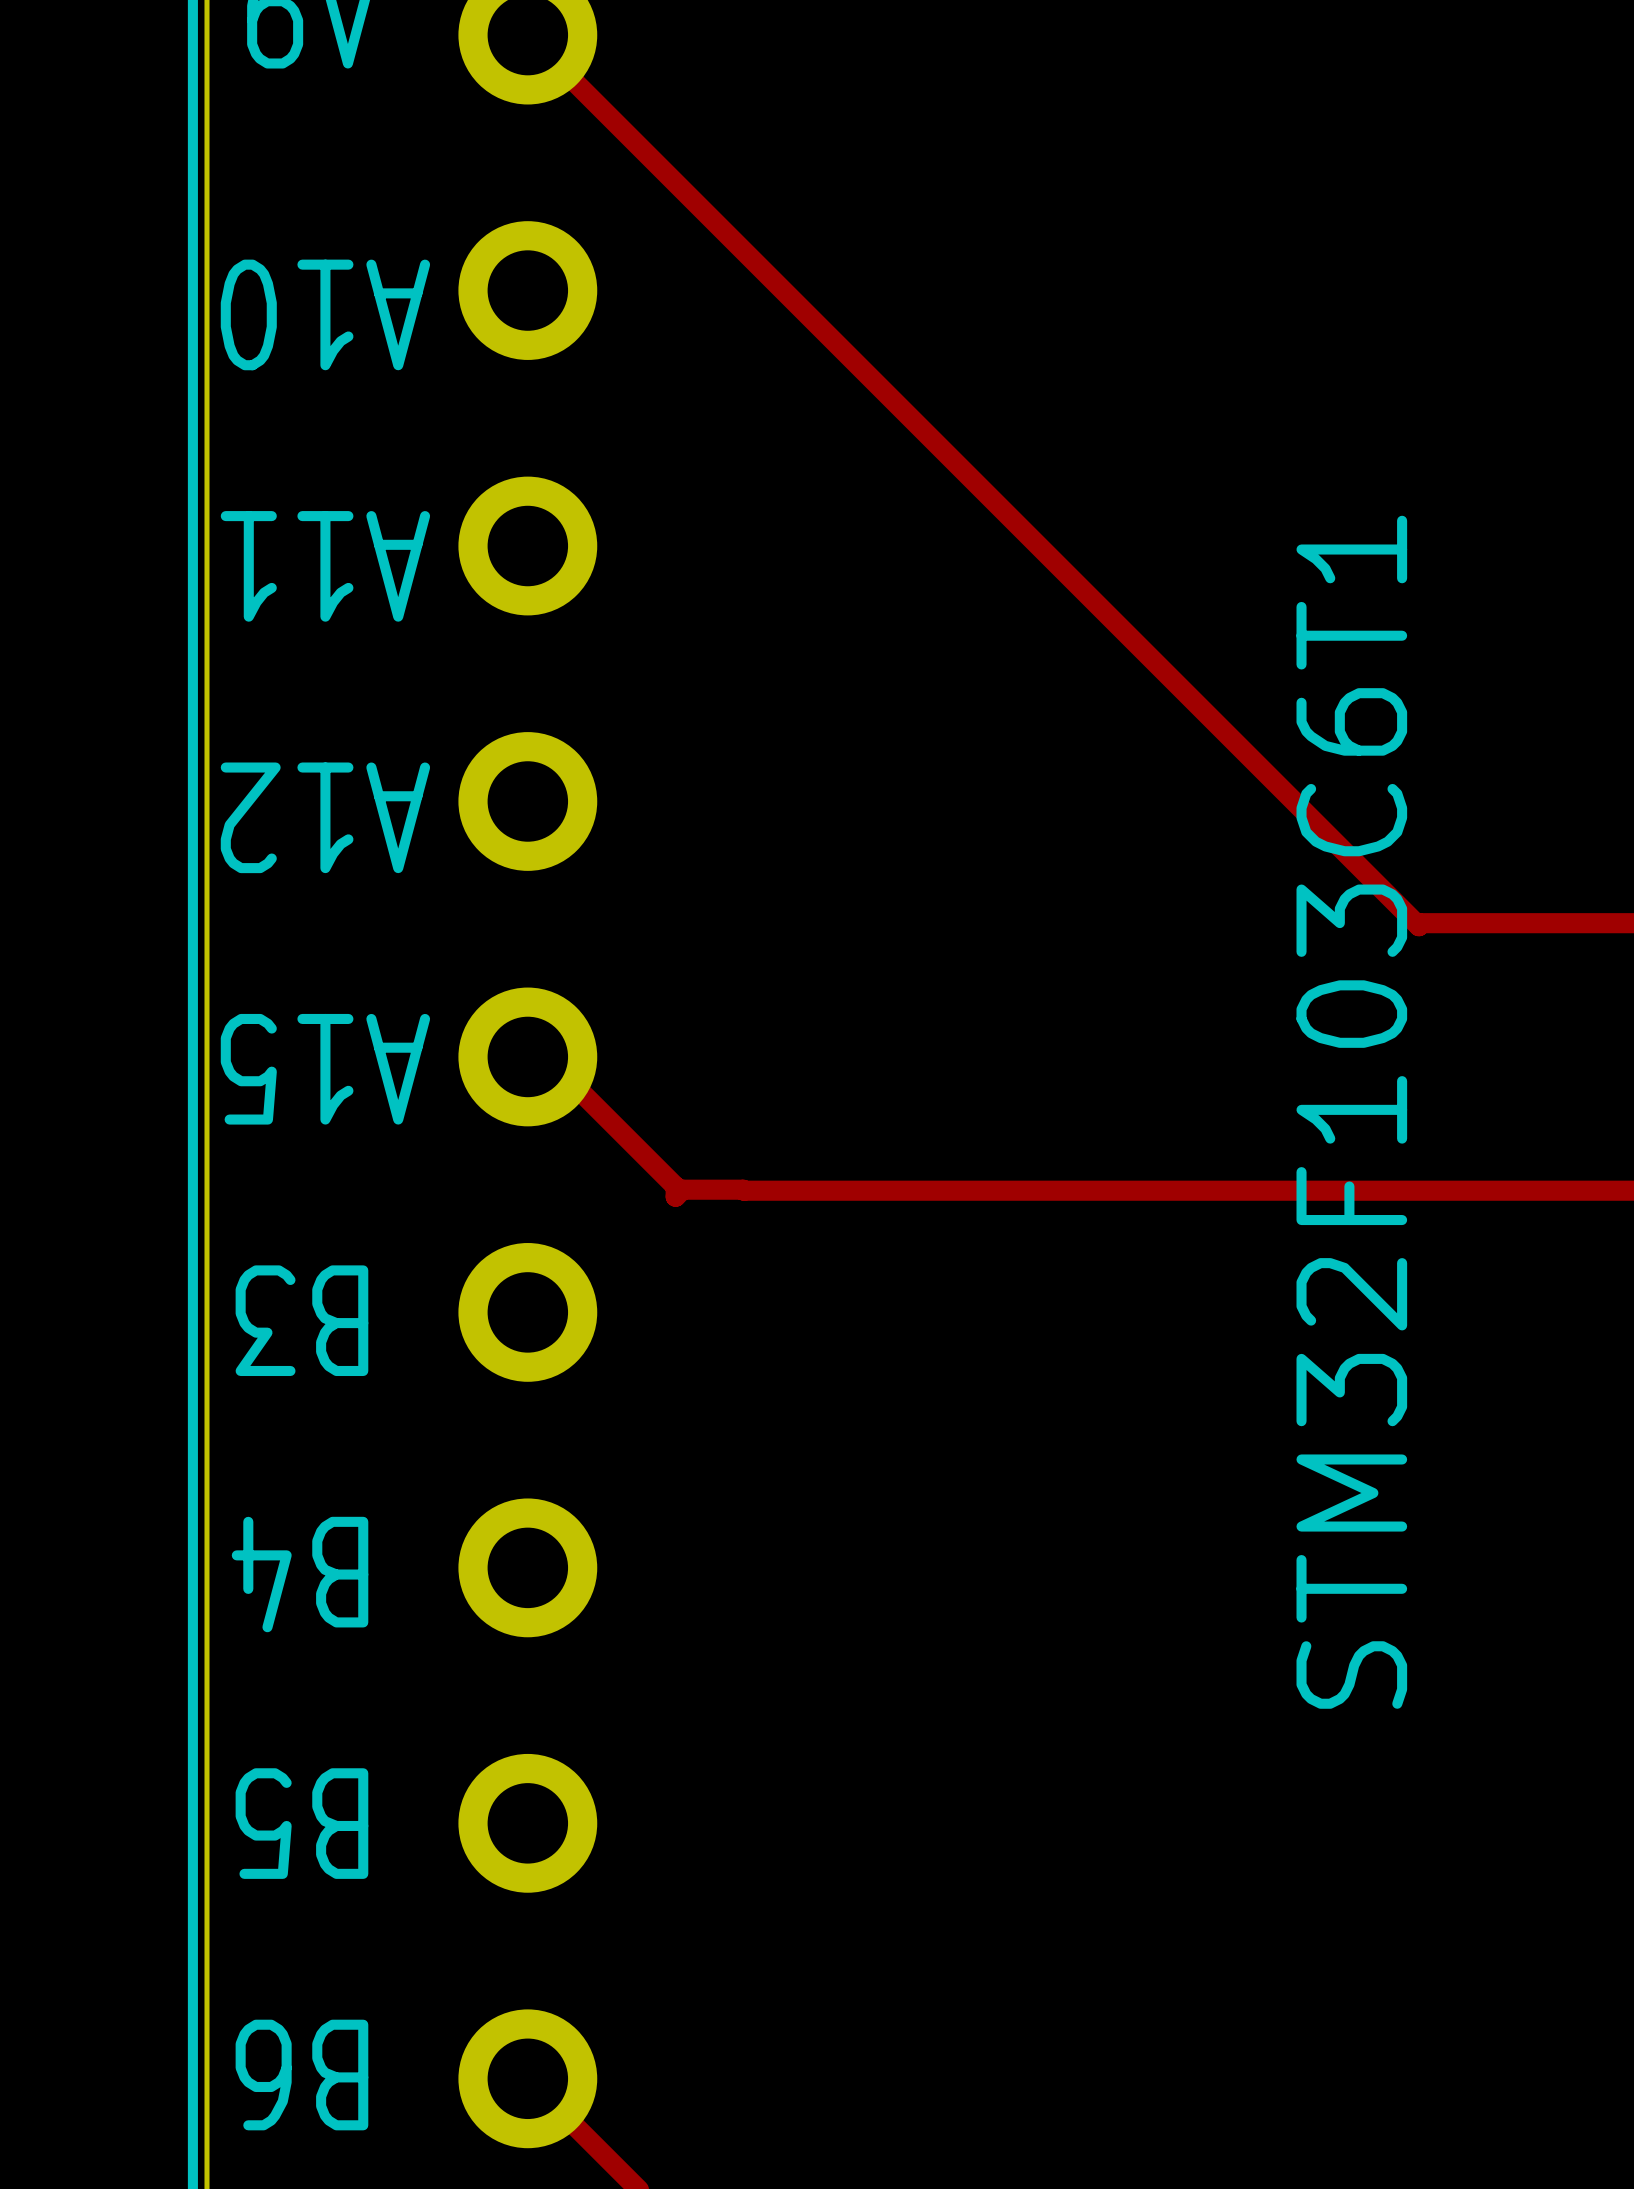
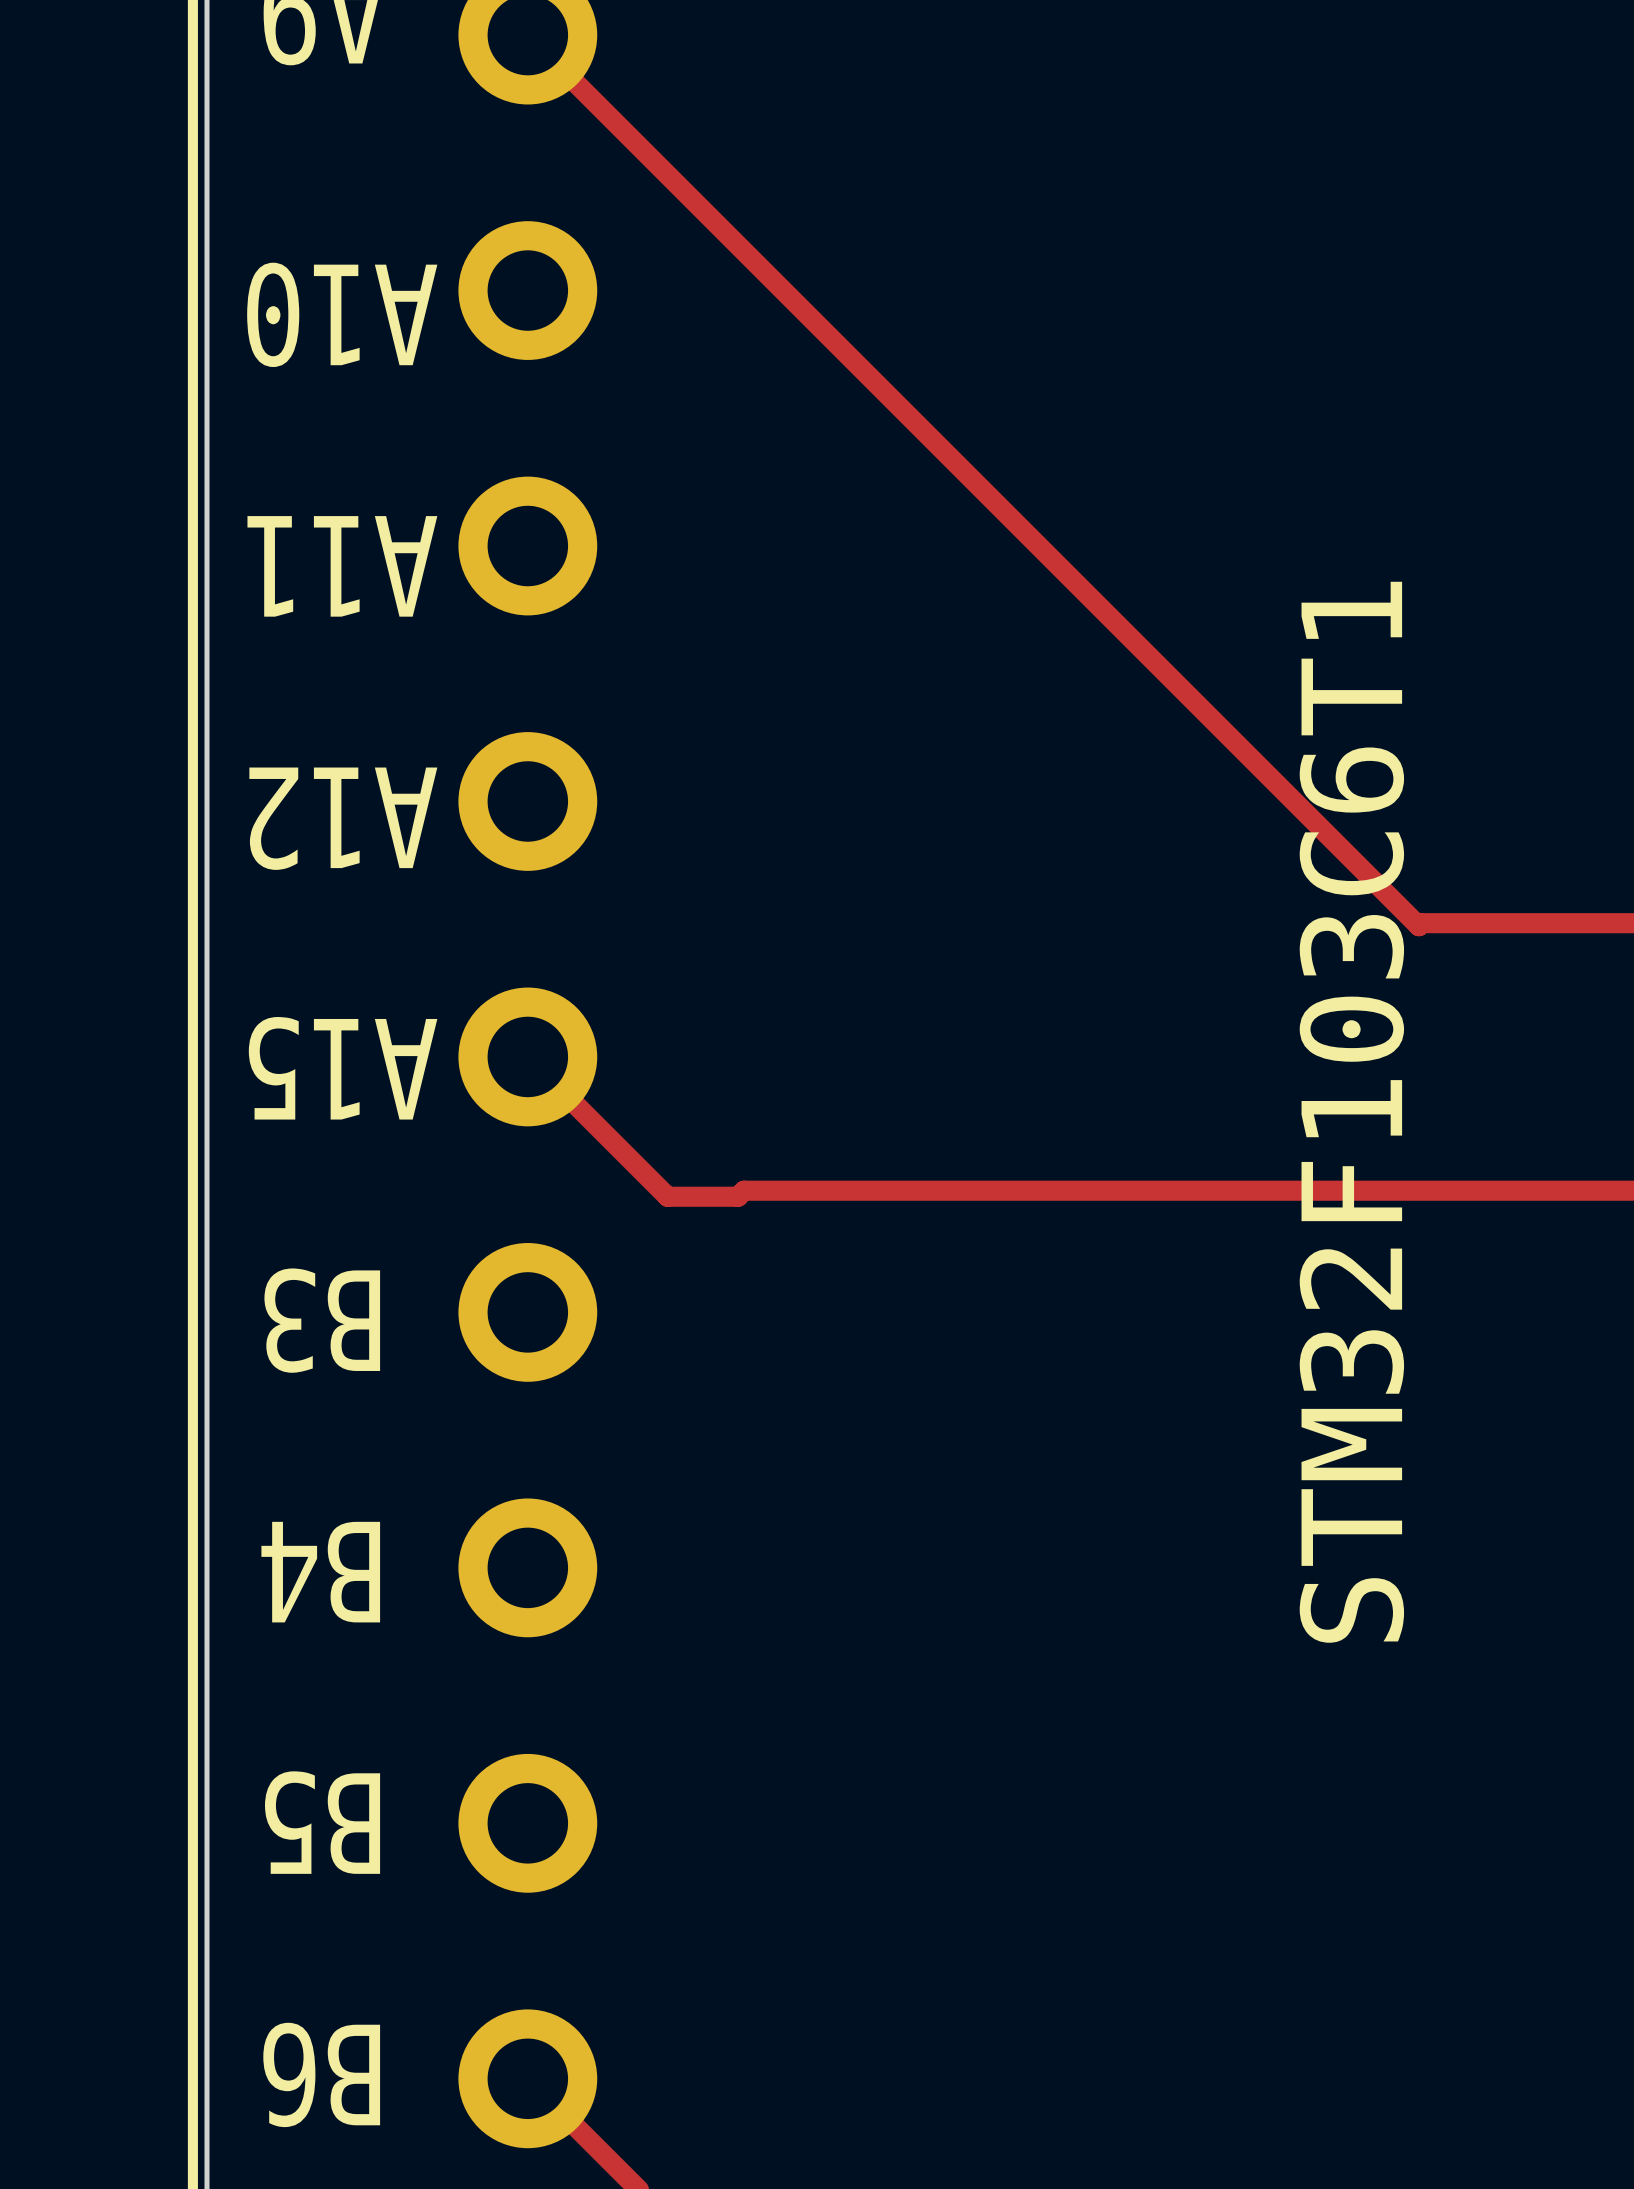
track: (527, 1056) (545, 1056) (675, 1186) (675, 1196) (682, 1189) (743, 1189) -> (527, 1056) (667, 1196) (738, 1196) (744, 1190)

